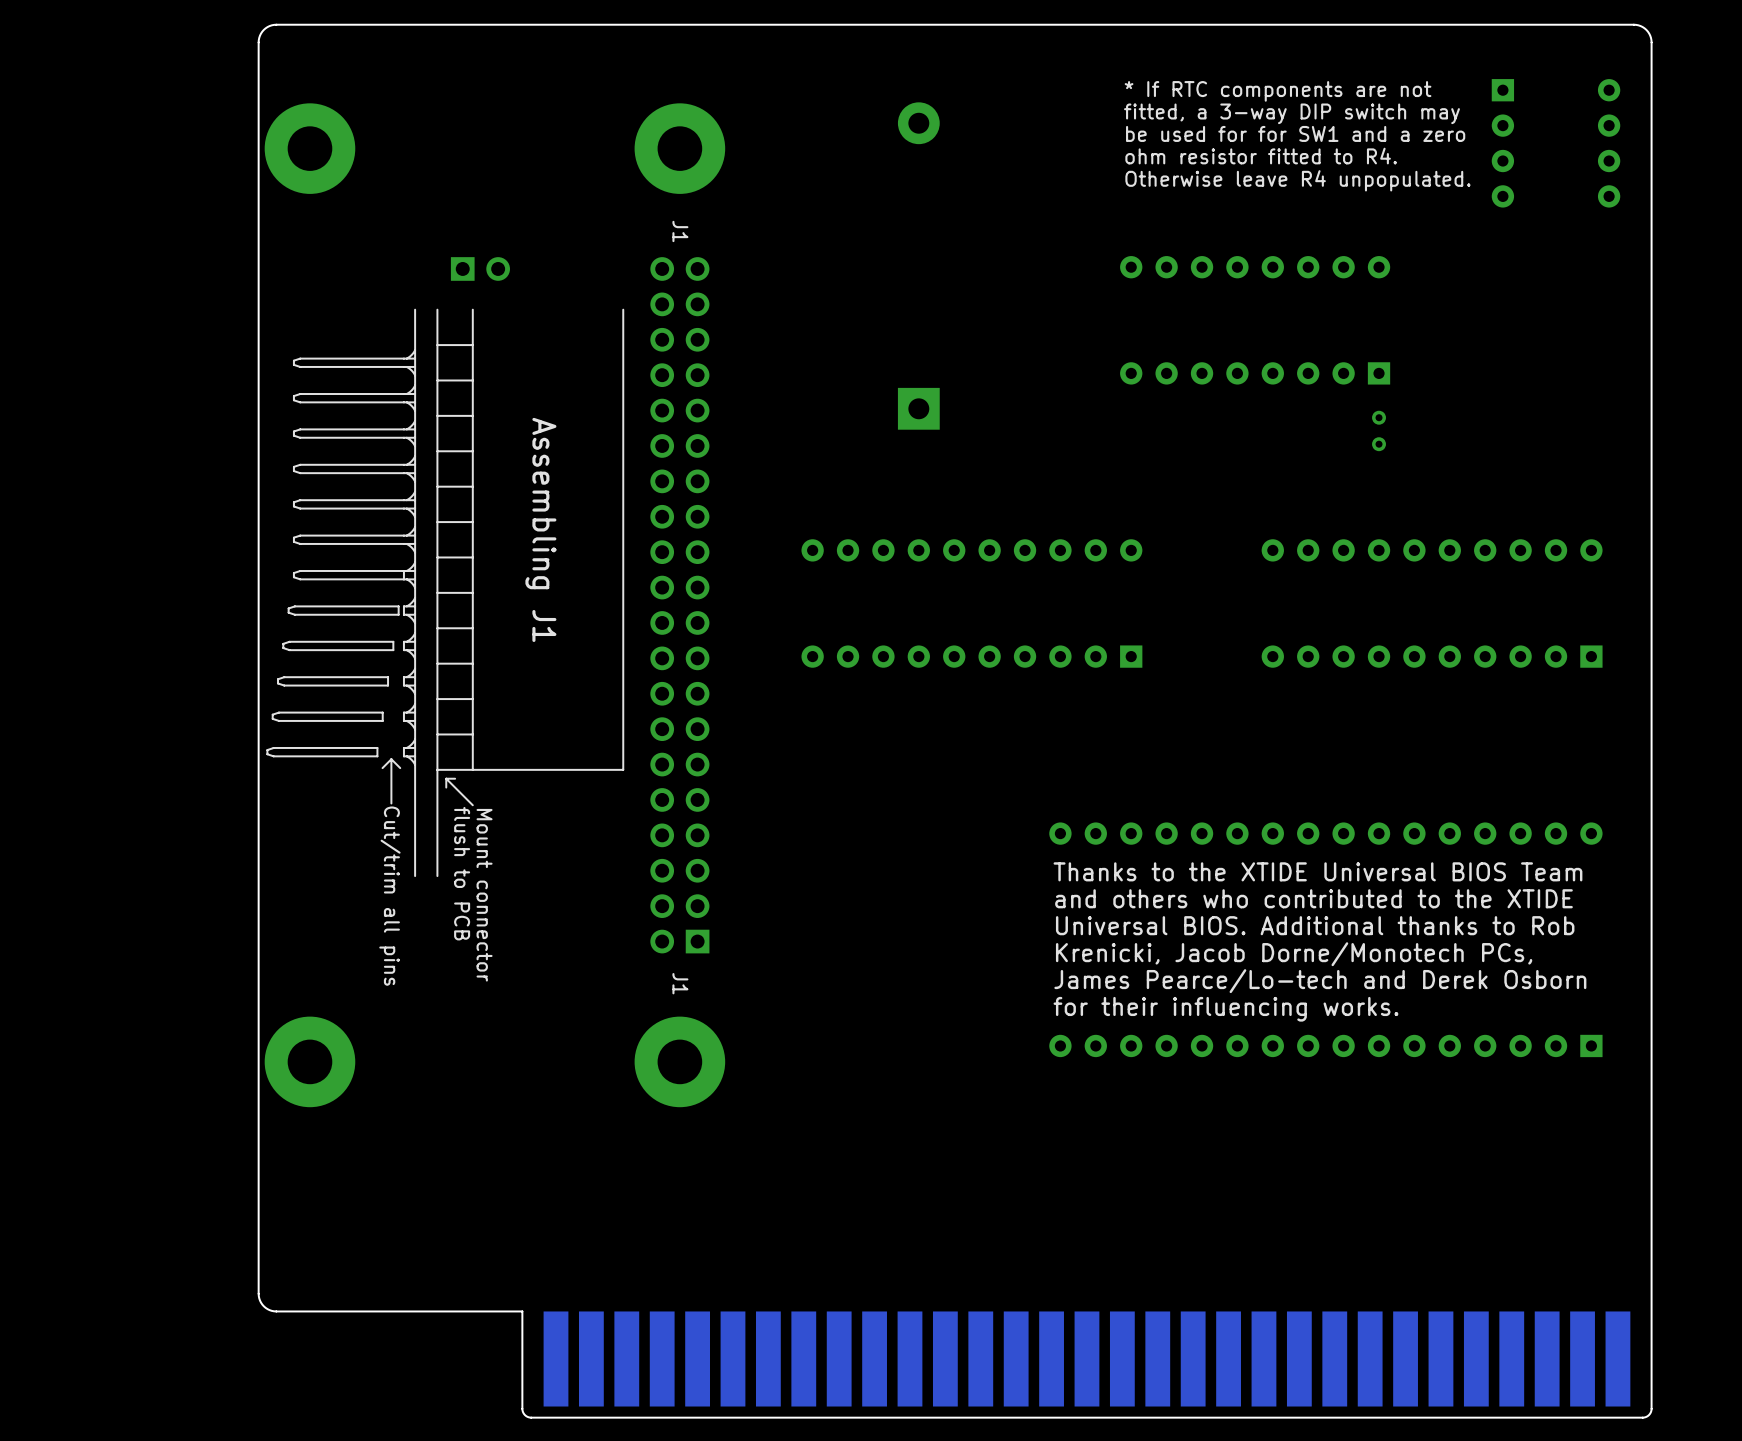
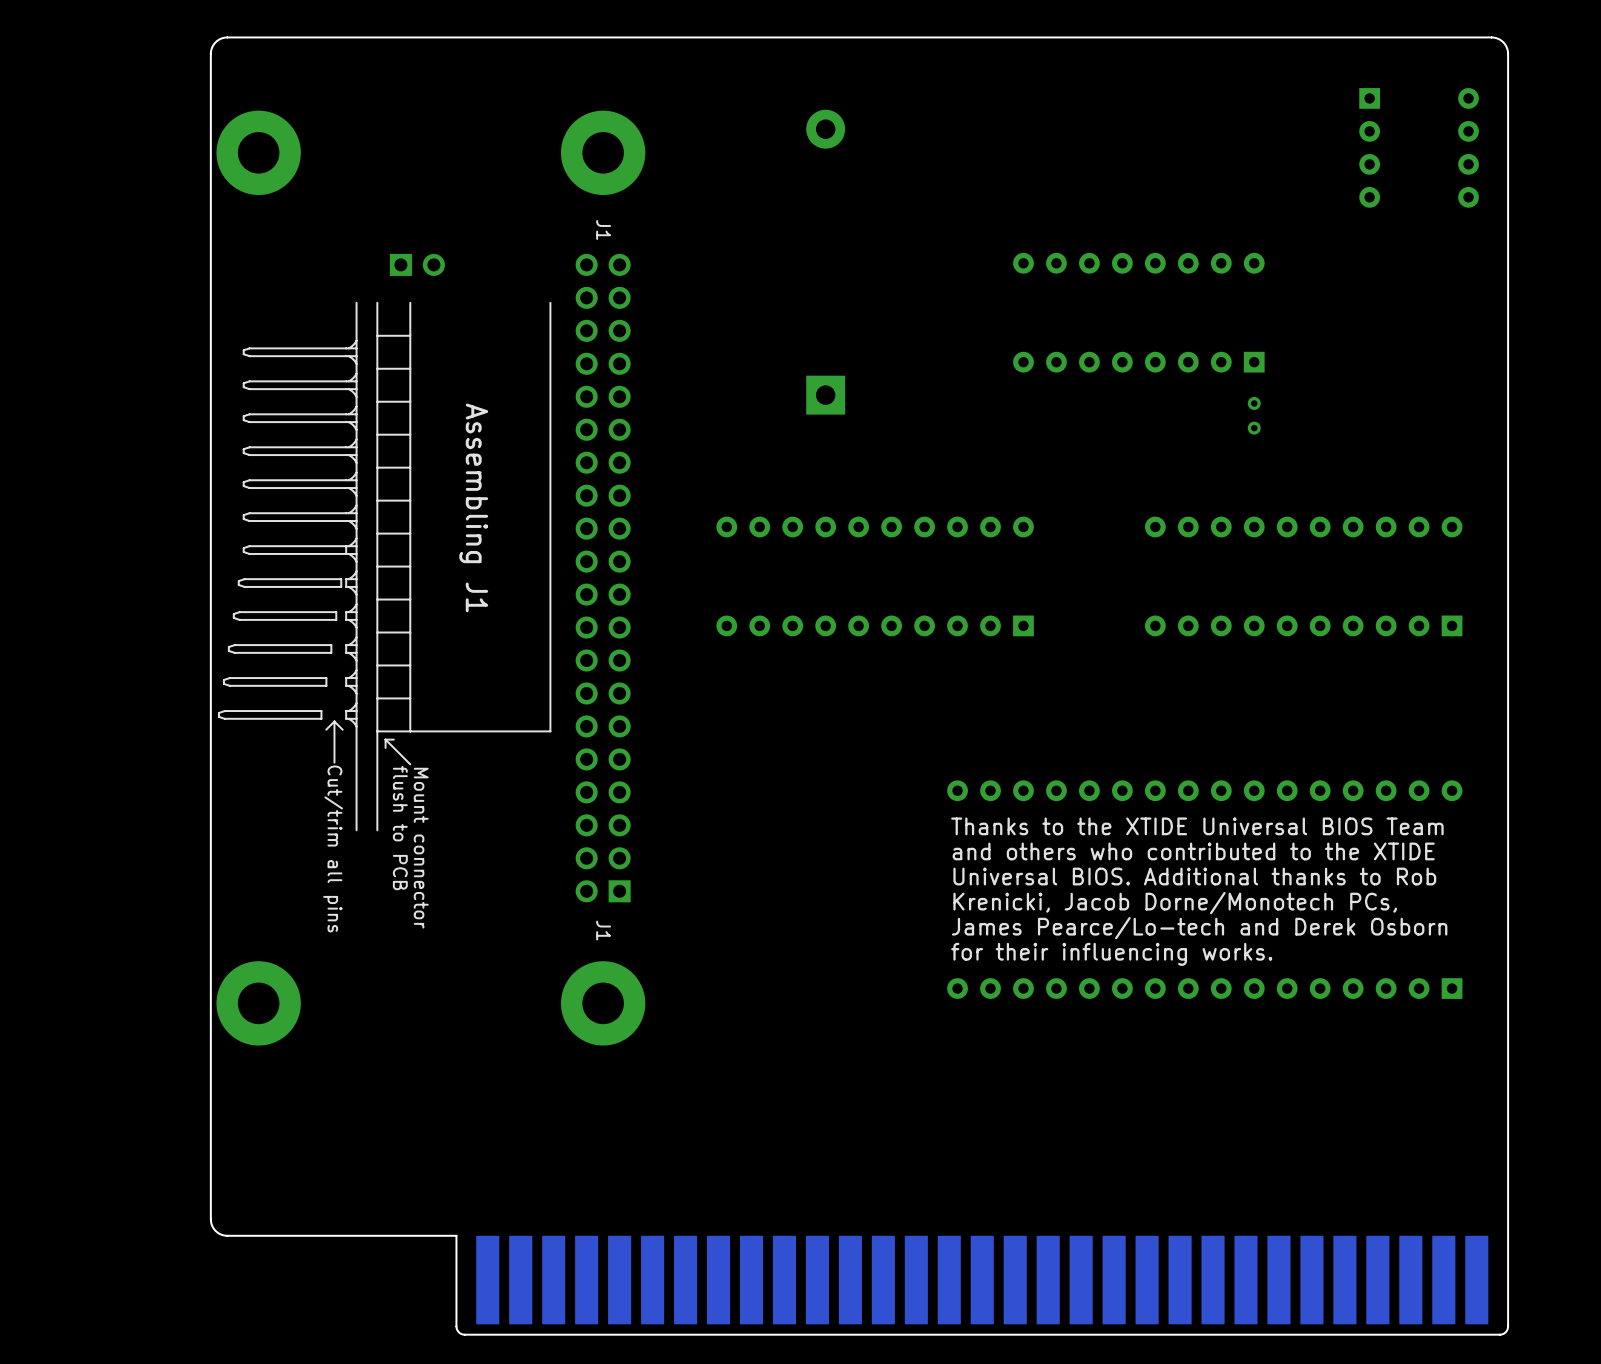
text: * If RTC components are not (1278, 91) -> none
text: fitted, a 3-way DIP switch may (1291, 113) -> none
text: be used for for SW1 and a zero (1295, 133) -> none
text: ohm resistor fitted to R4. (1261, 156) -> none
text: Otherwise leave R4 unpopulated. (1297, 180) -> none

